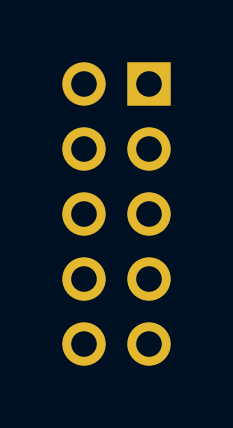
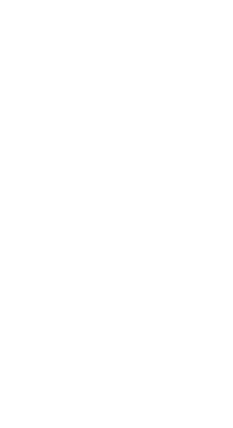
part: (116, 214) -> none

